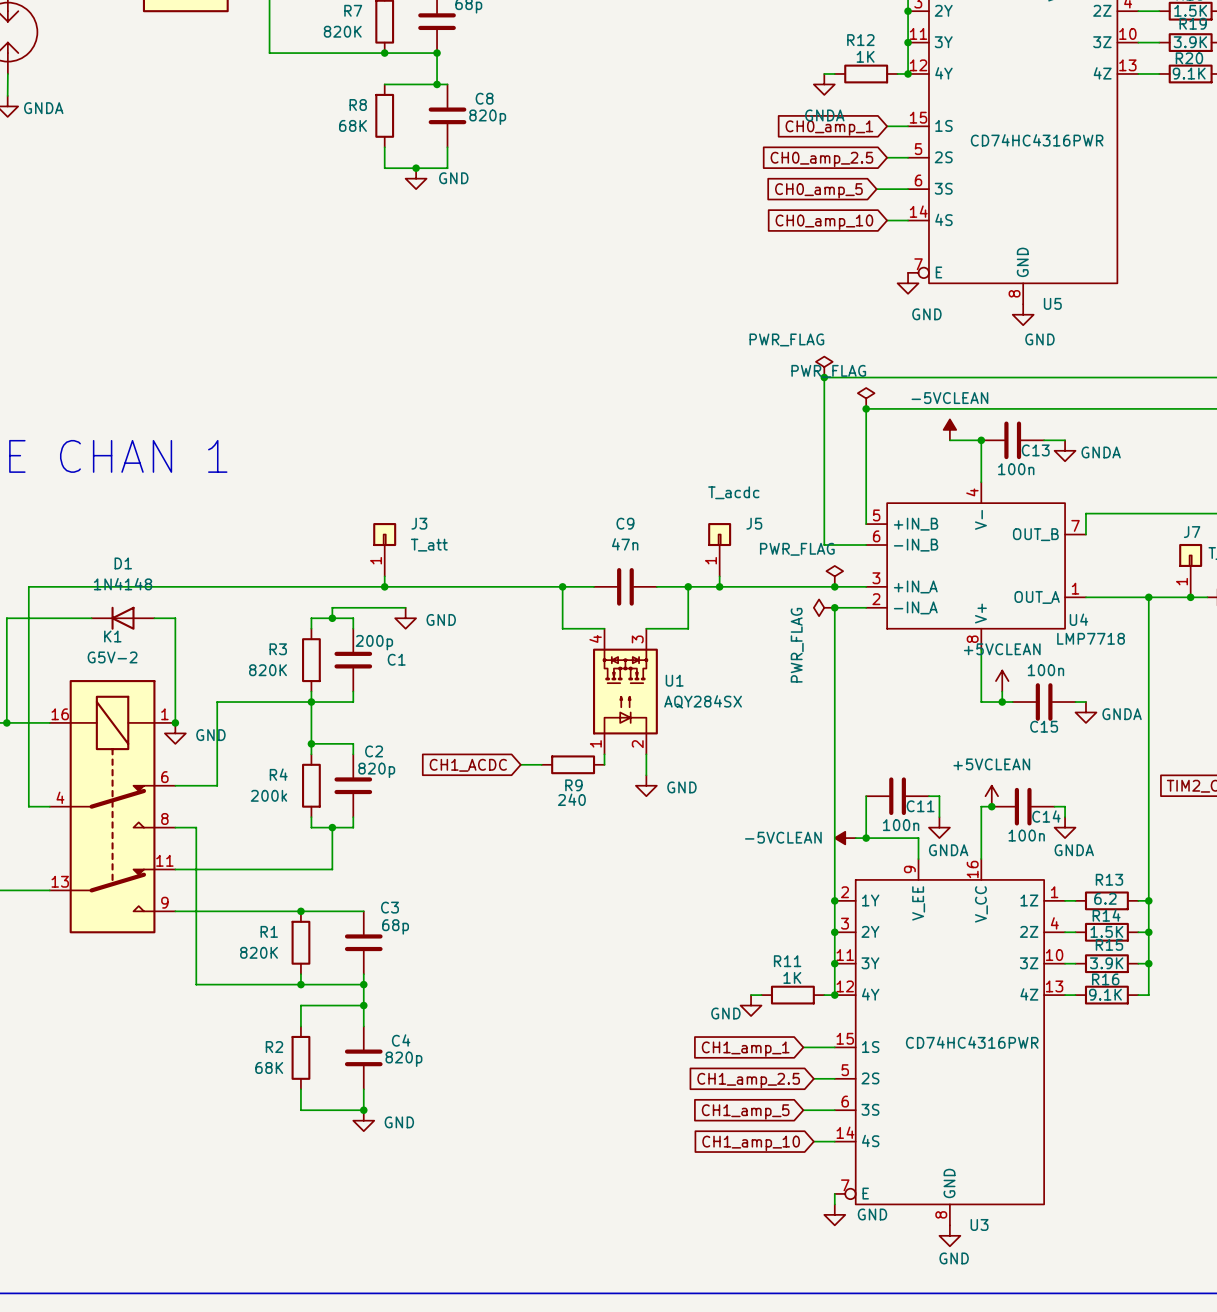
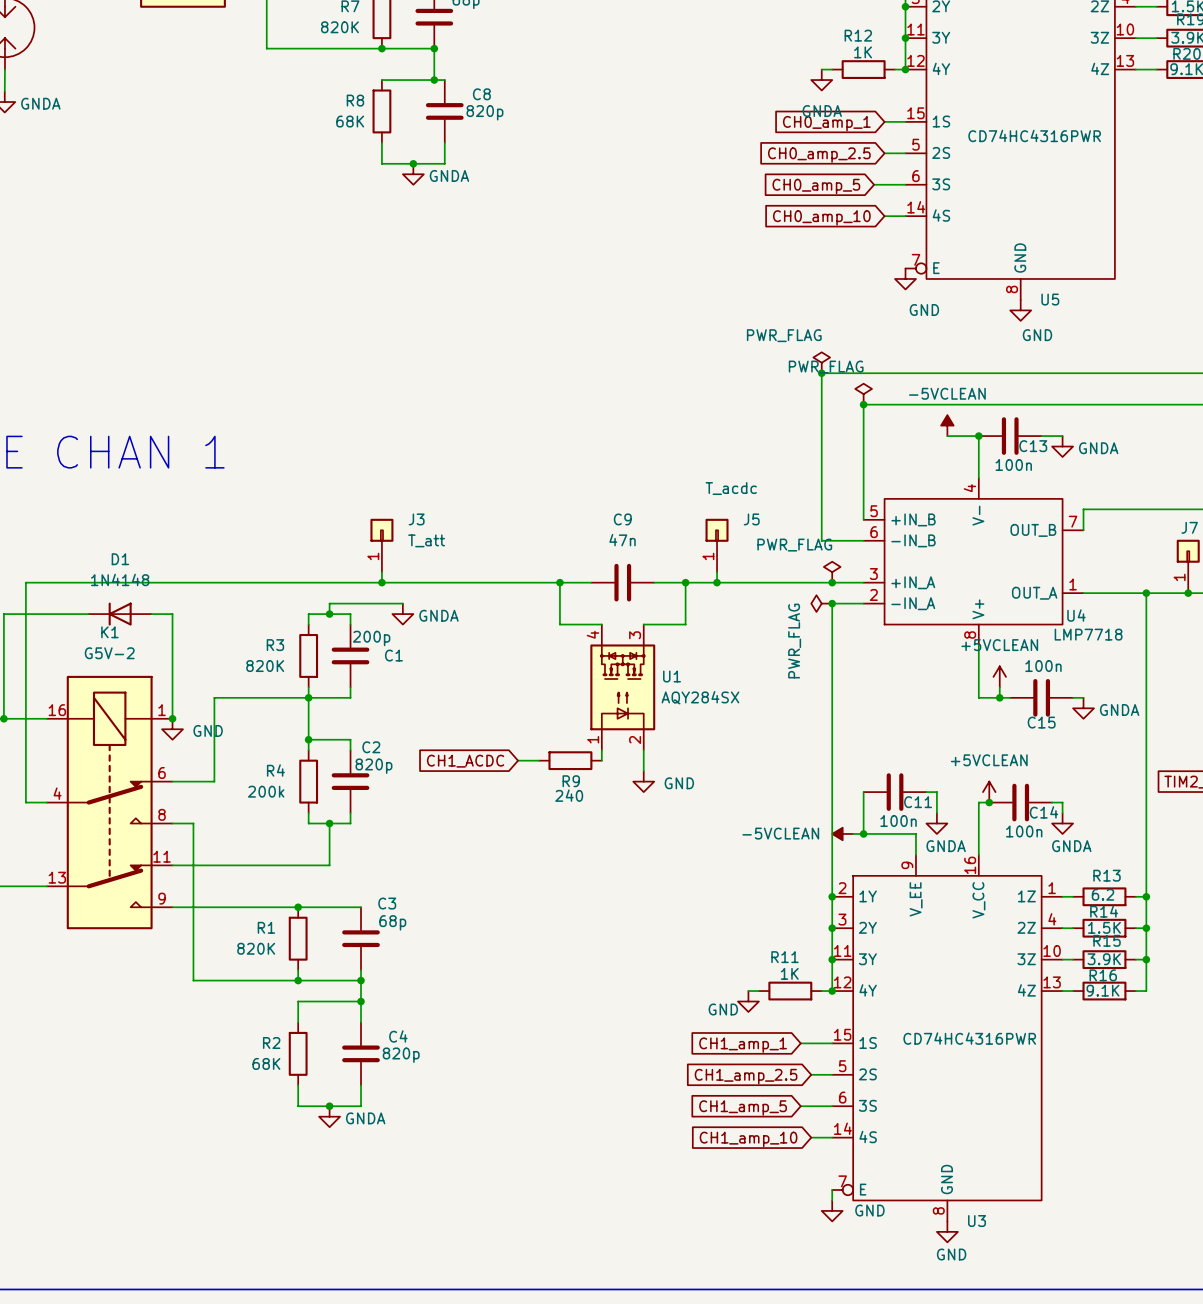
power symbol: GND (416, 178) -> GNDA (413, 174)
power symbol: GND (405, 618) -> GNDA (402, 614)
junction position: (363, 1110) -> (329, 1106)
power symbol: none -> GNDA (329, 1116)
power symbol: GND (363, 1120) -> none

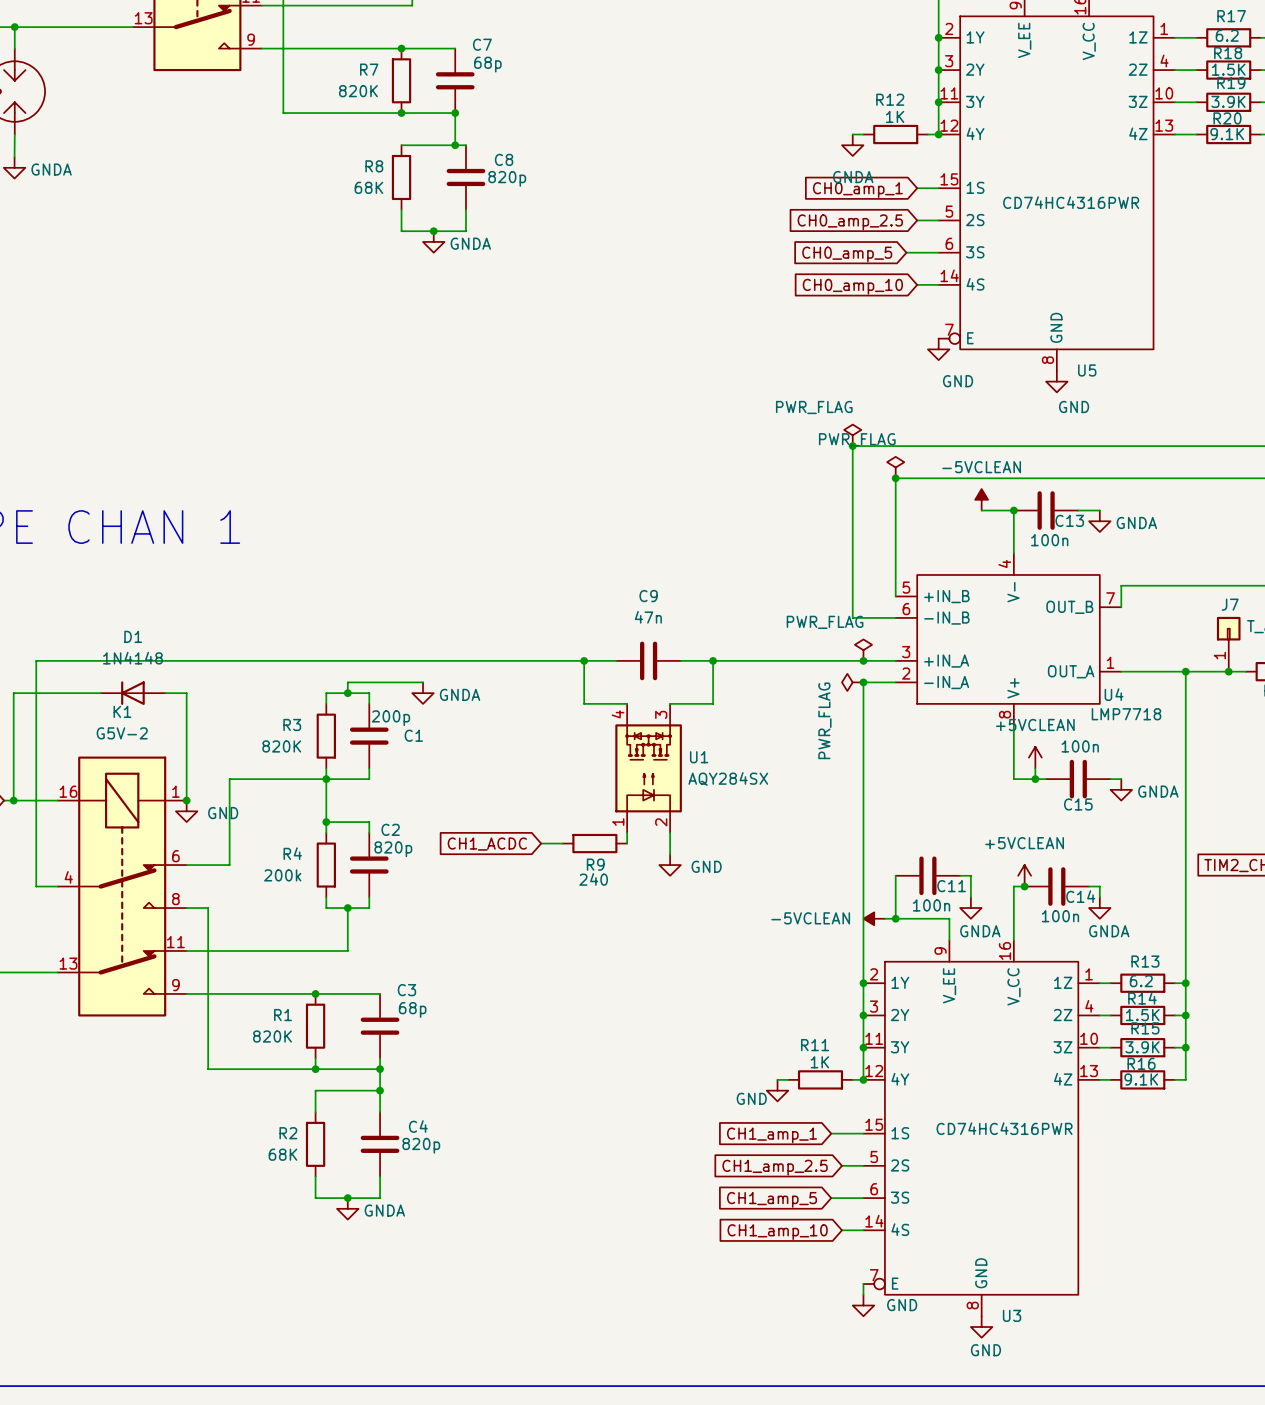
J3: T_att (381, 545) -> none
J5: T_acdc (717, 545) -> none
wire: (381, 572) (381, 582) -> none
wire: (717, 572) (717, 582) -> none
junction: (381, 582) -> none
junction: (717, 582) -> none

